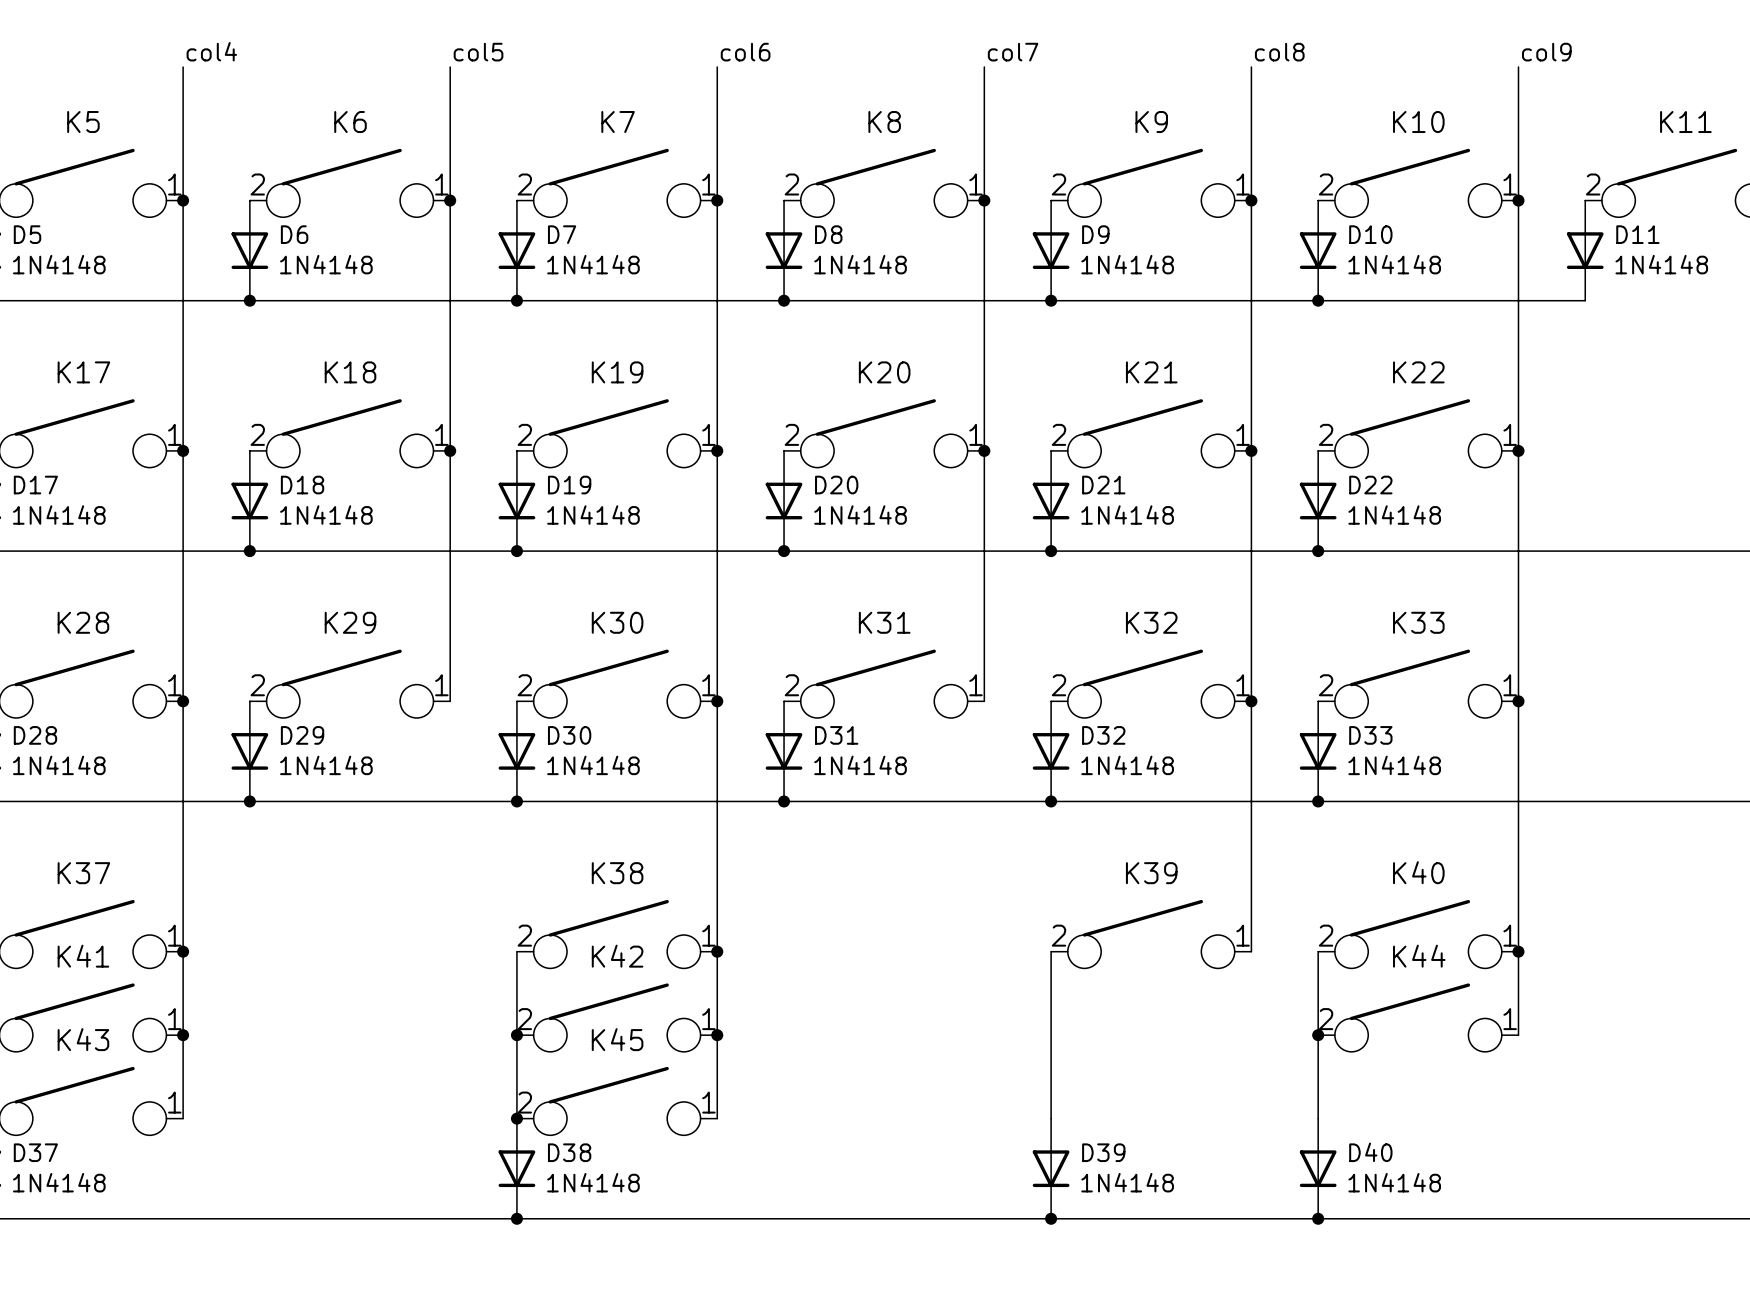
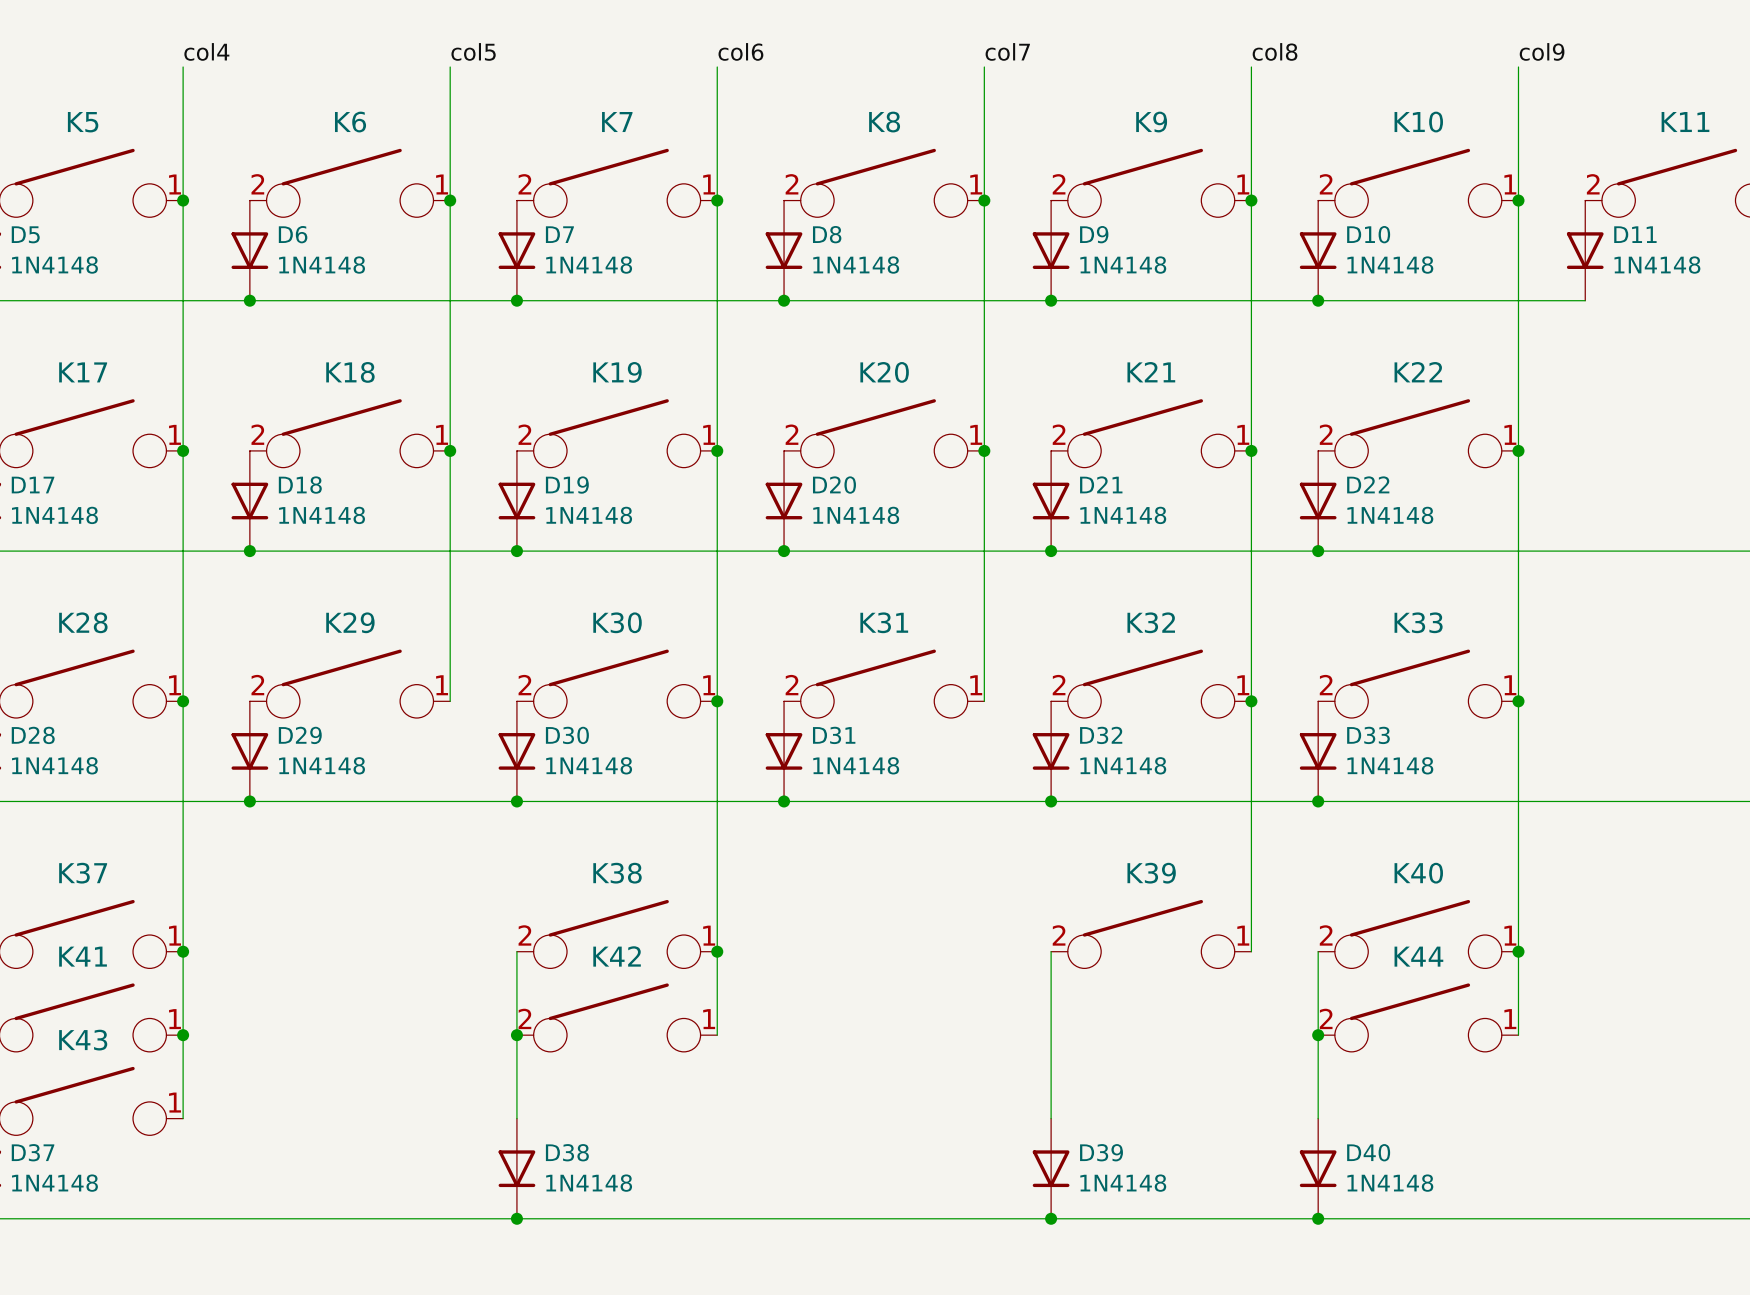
wire: (717, 1035) (717, 1118) -> none
junction: (717, 1035) -> none
K45: (617, 1101) -> none
junction: (516, 1118) -> none

